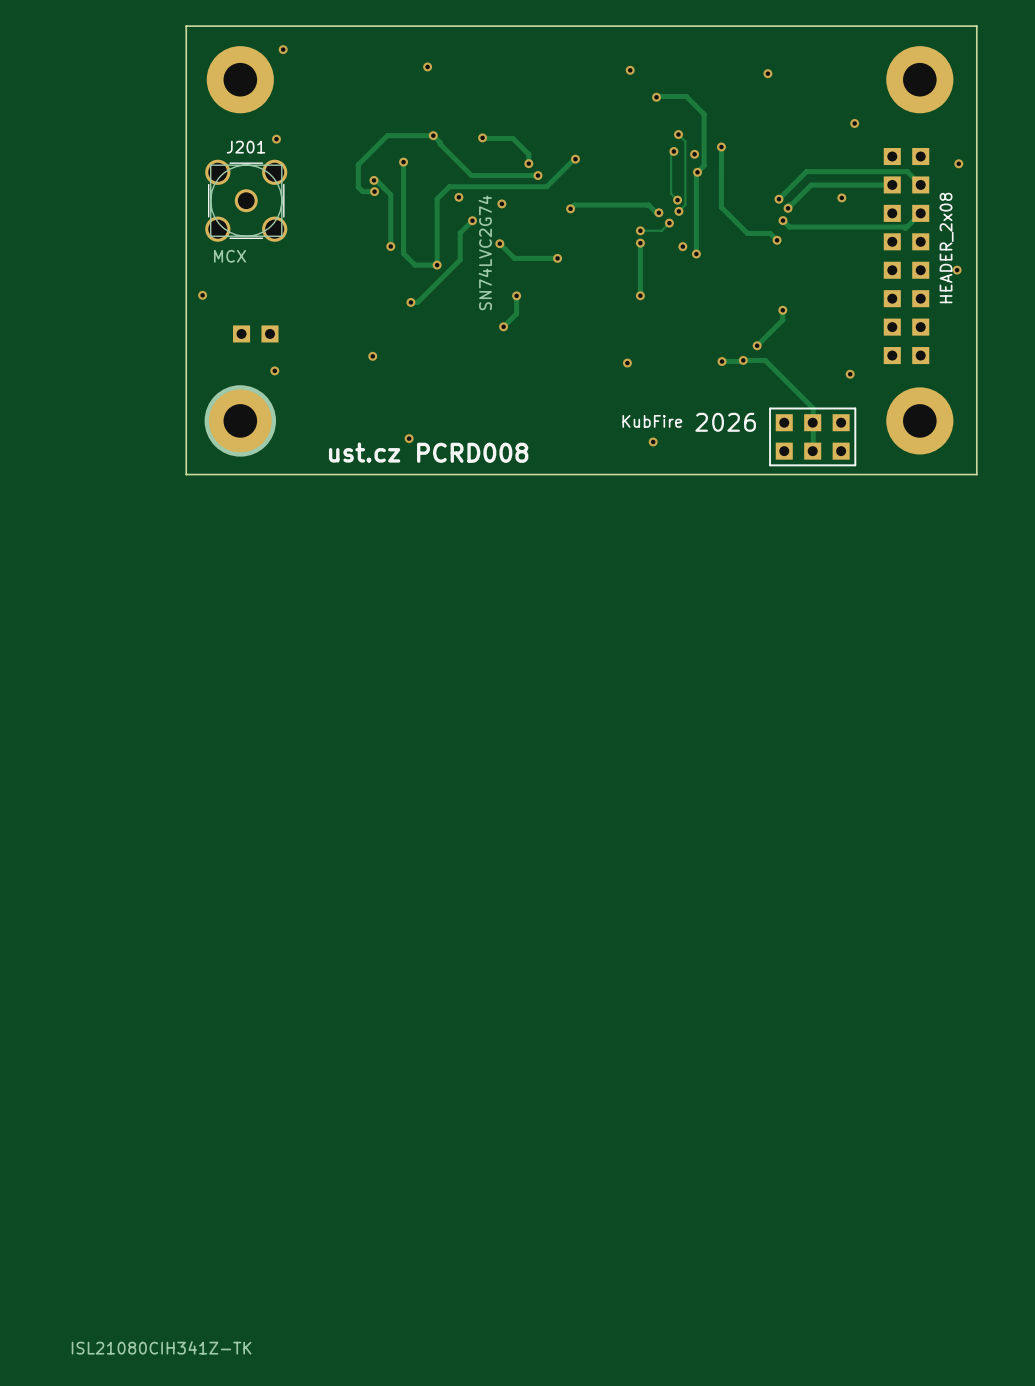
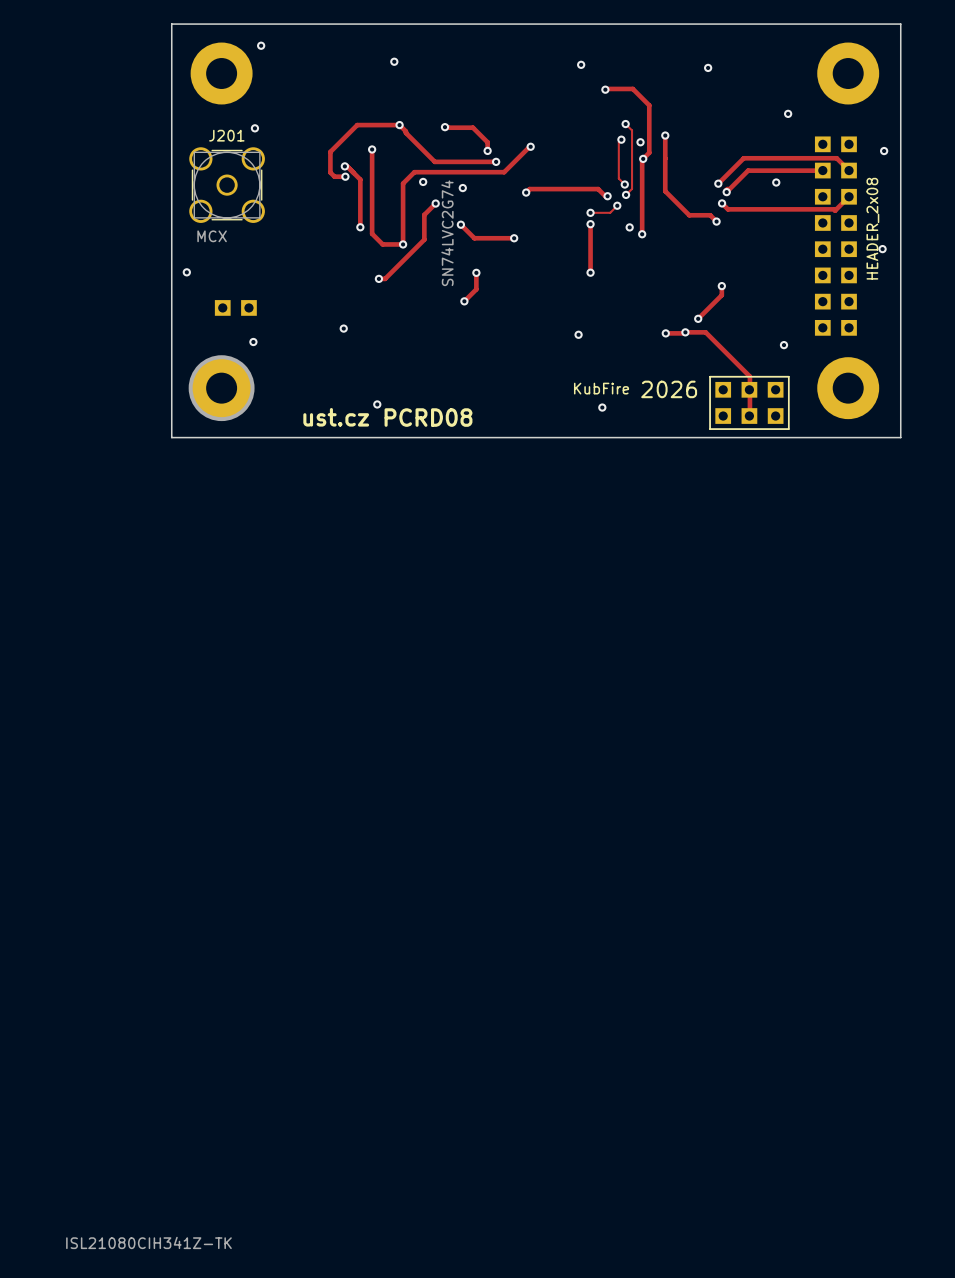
text: PCRD008 (472, 452) -> PCRD08 (428, 417)

